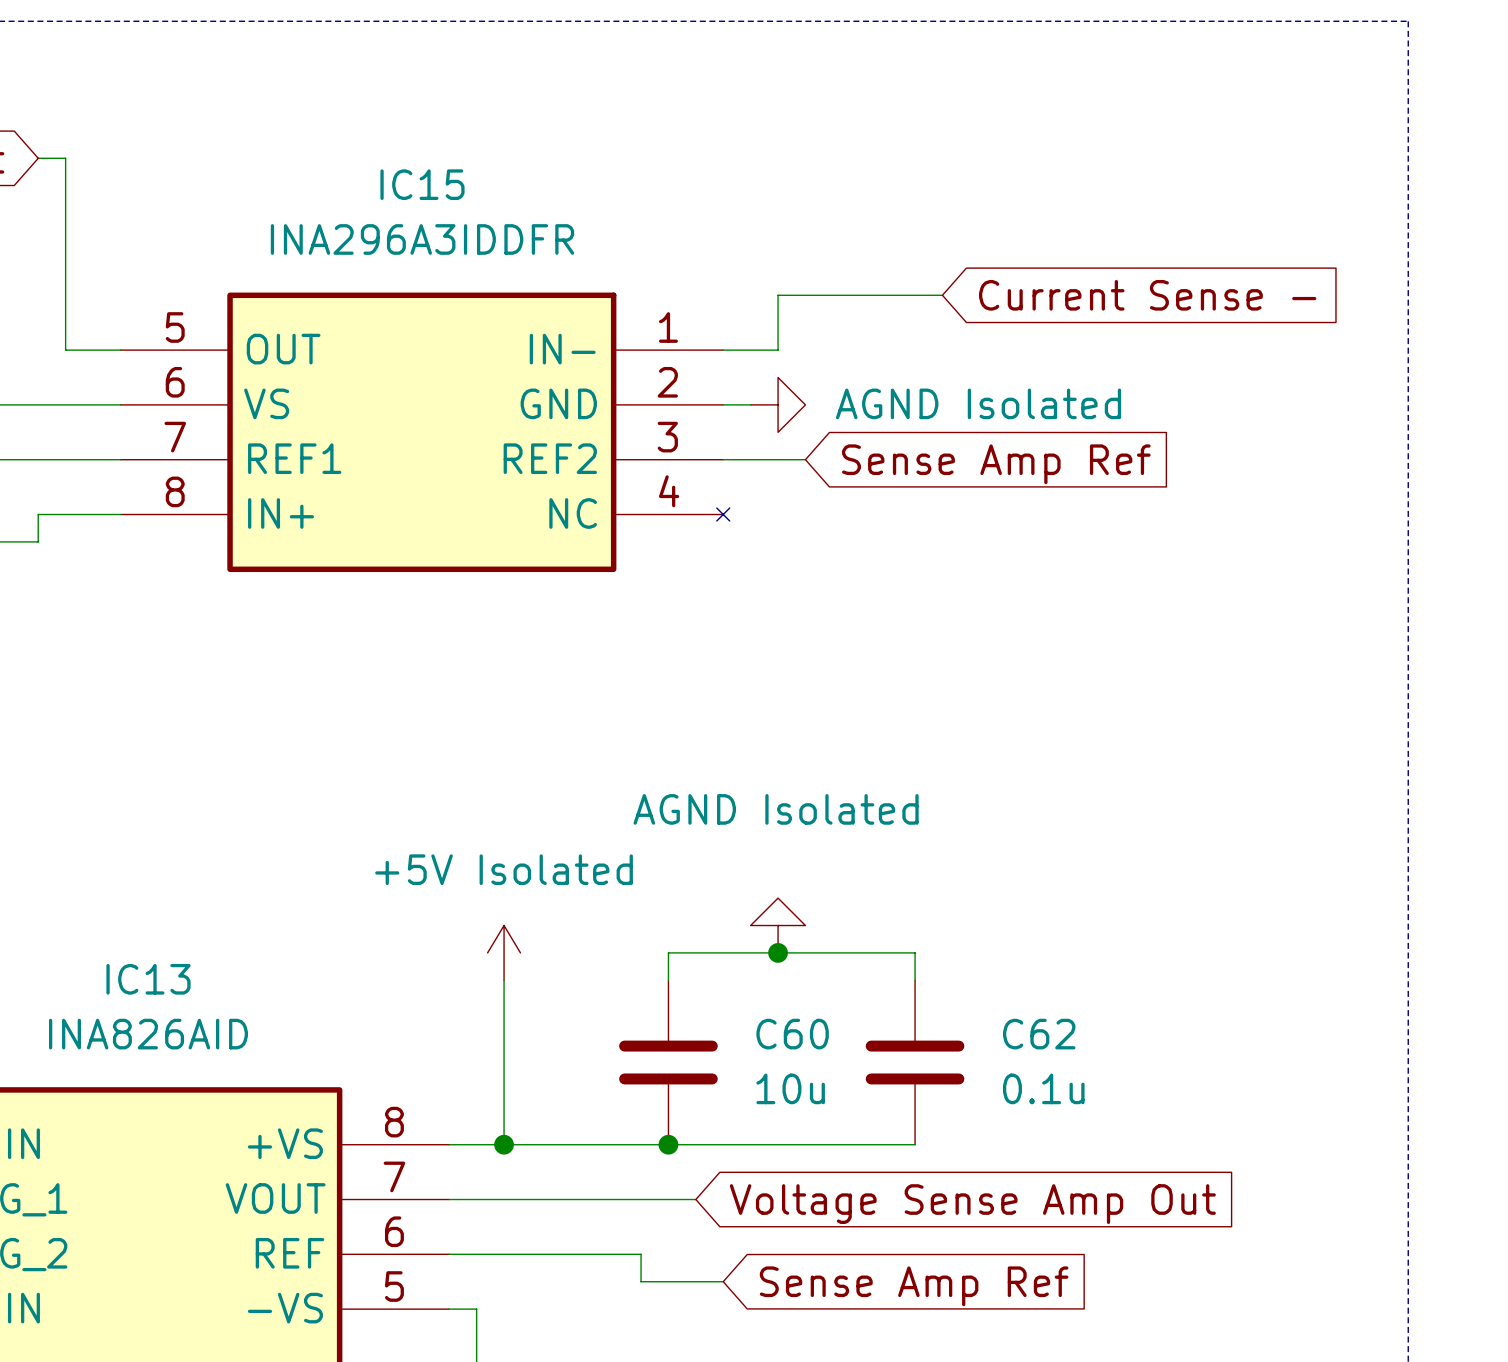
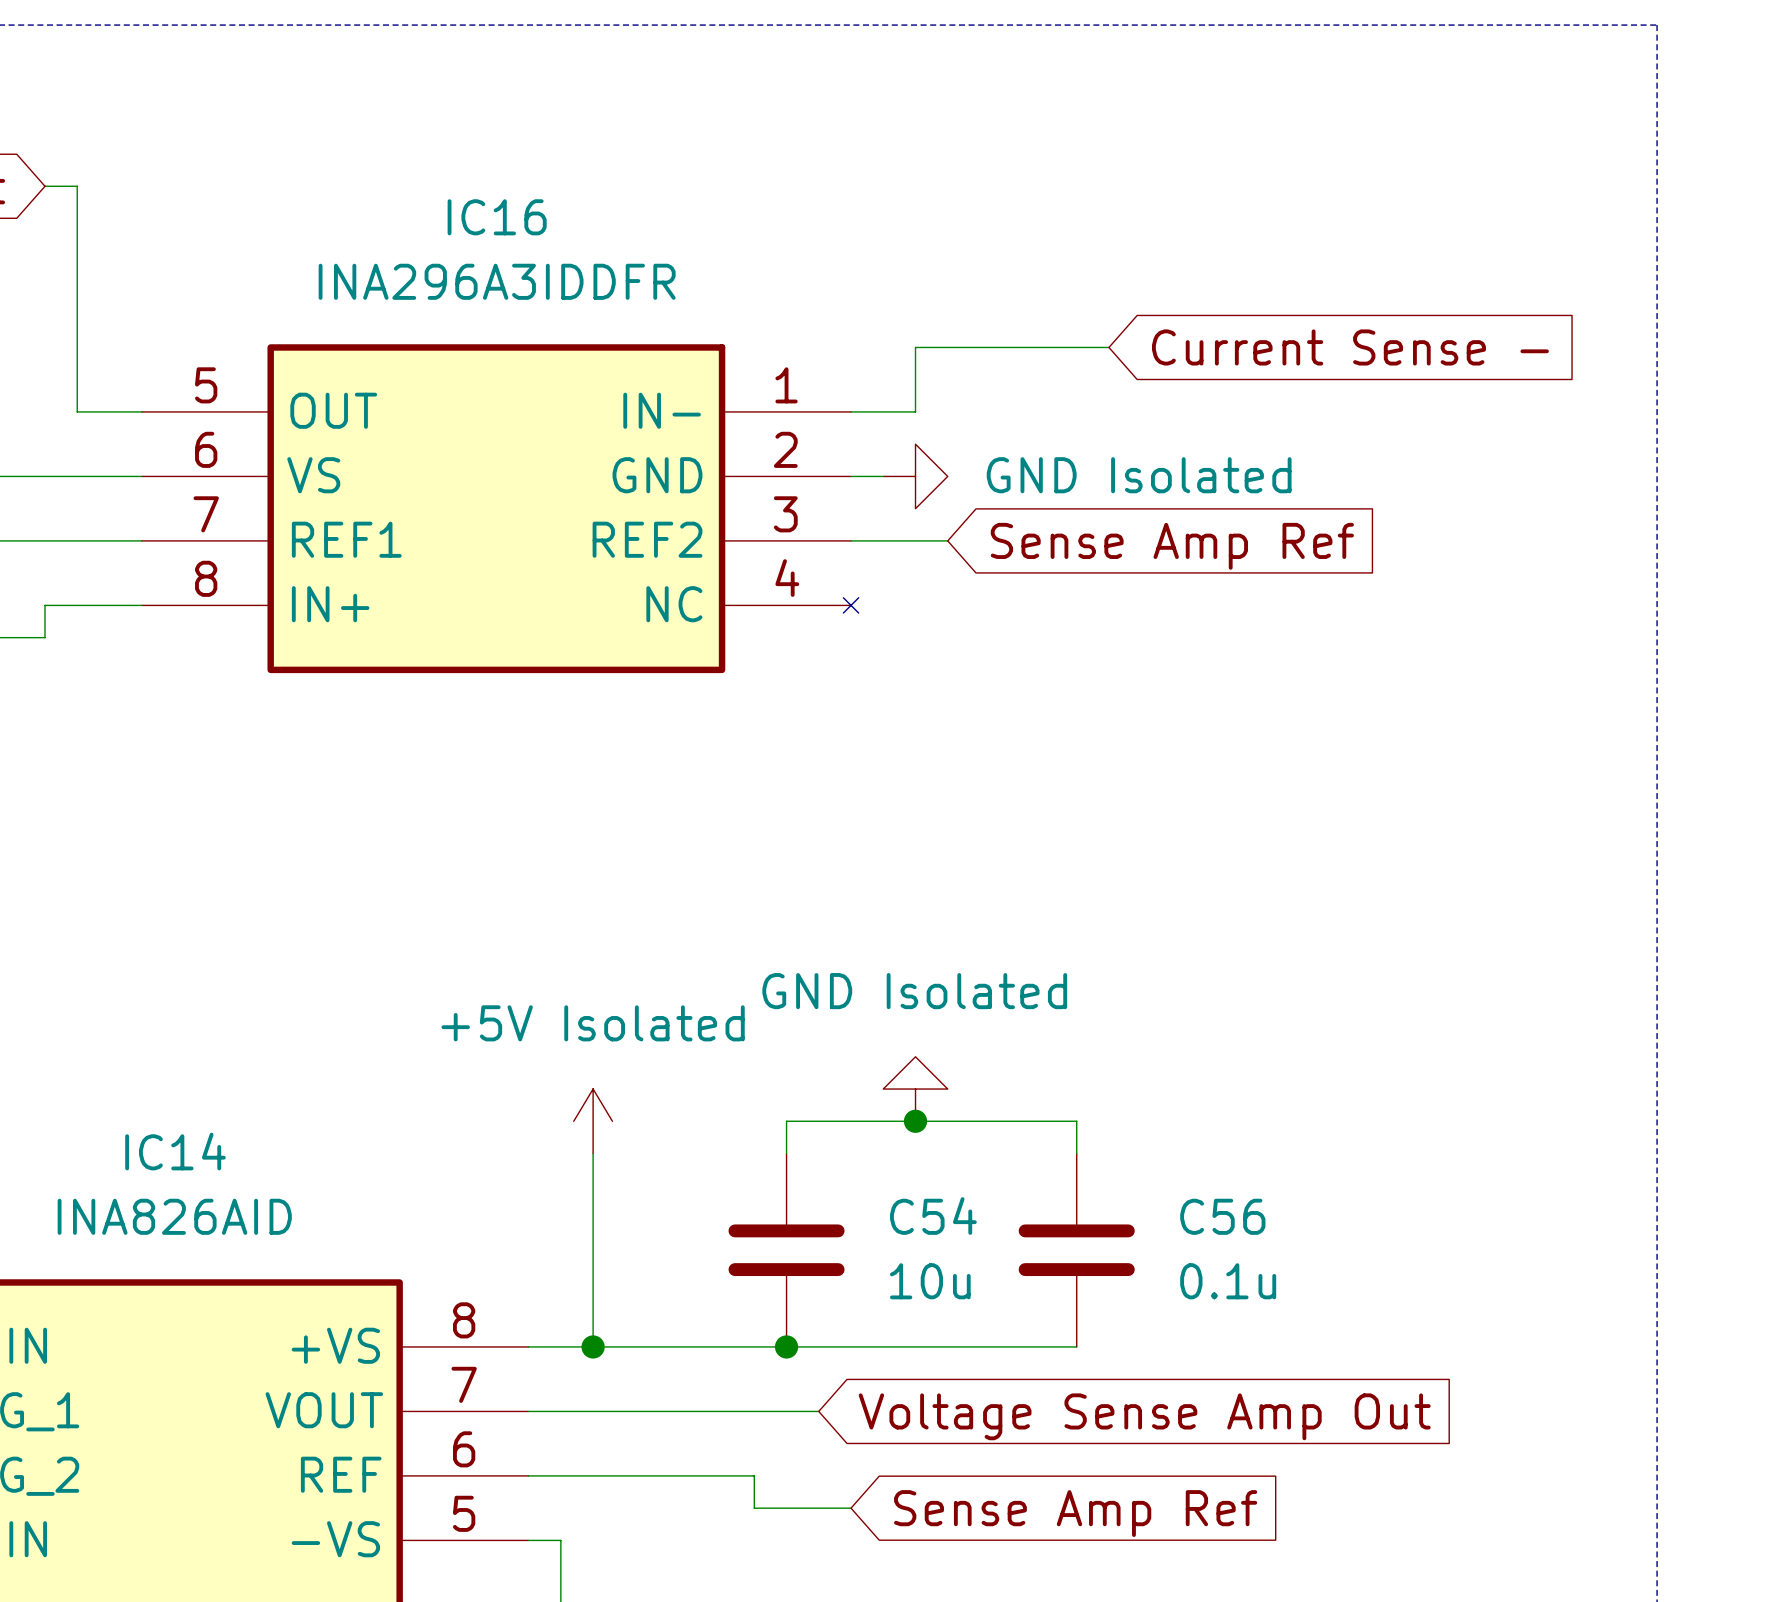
IC15 name: IC15 (422, 184) -> IC16 (497, 217)
power symbol: AGND Isolated (778, 404) -> GND Isolated (915, 476)
power symbol: AGND Isolated (778, 925) -> GND Isolated (915, 1089)
IC13 name: IC13 (148, 979) -> IC14 (175, 1151)
C60 name: C60 (792, 1034) -> C54 (933, 1216)
C62 name: C62 (1039, 1034) -> C56 (1222, 1216)

